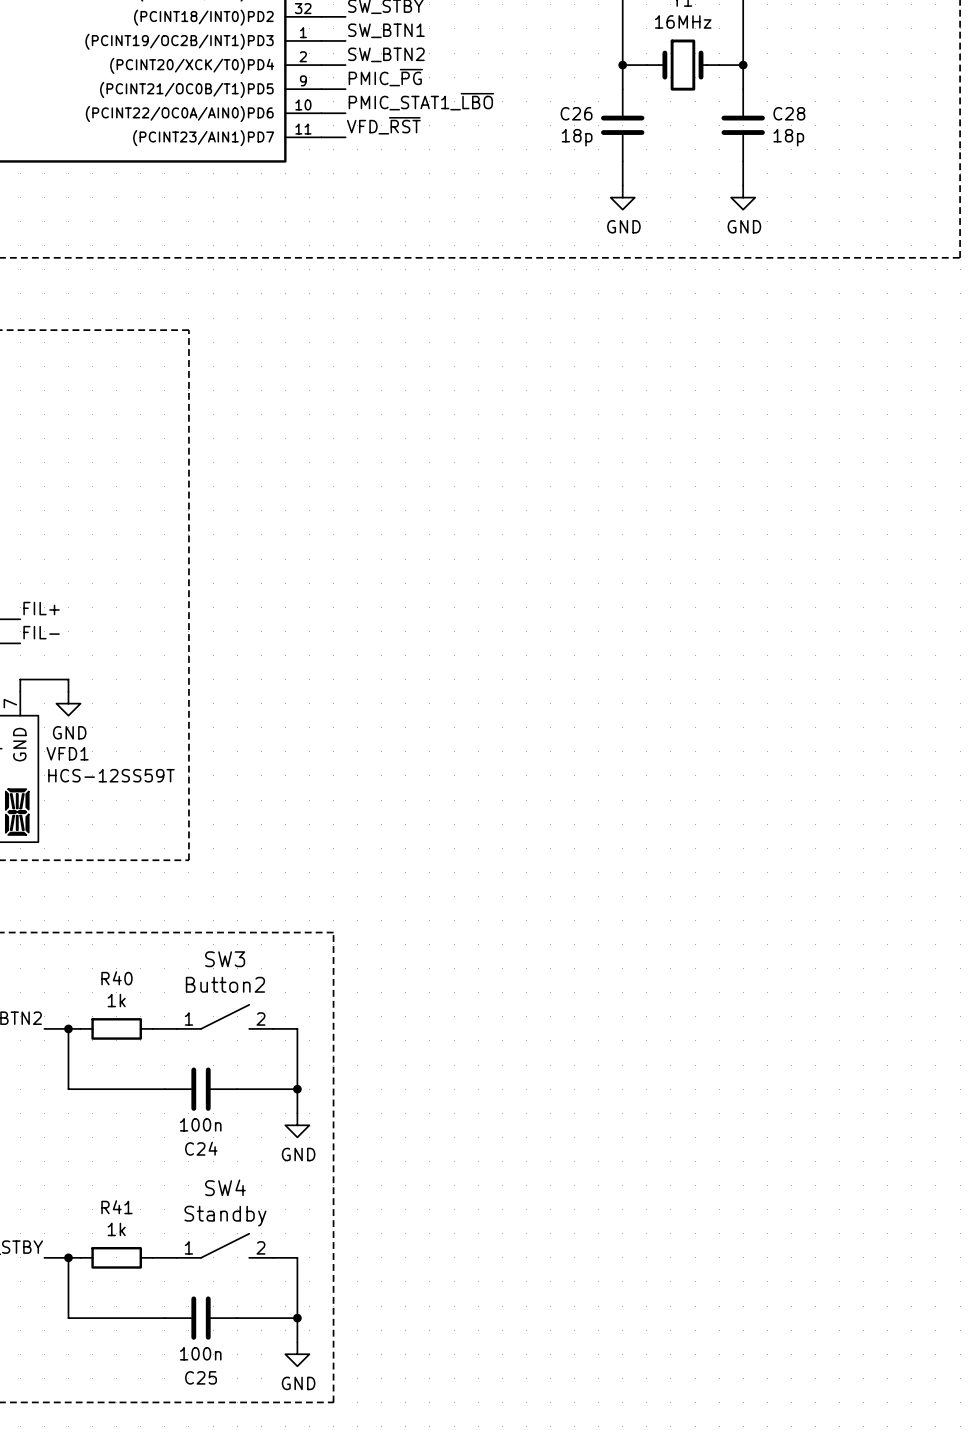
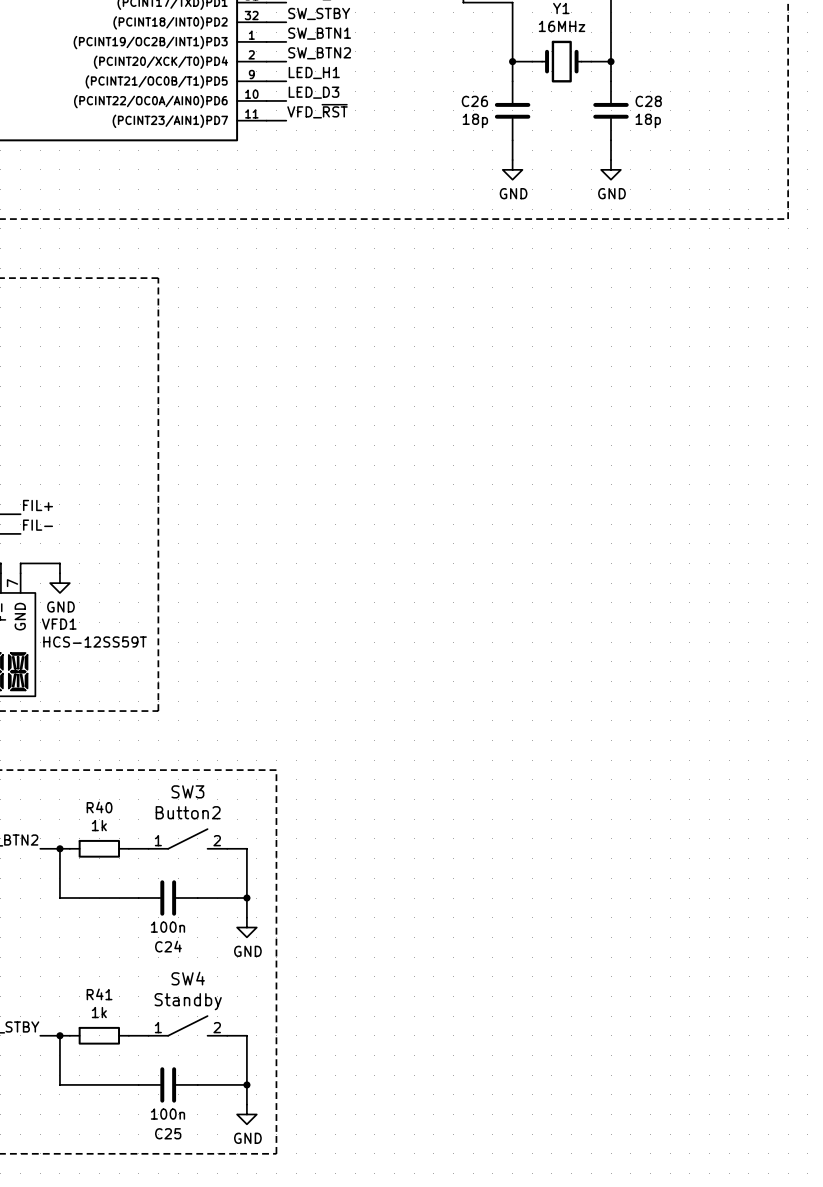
label: PMIC_~{PG} (385, 77) -> LED_H1 (314, 72)
label: PMIC_STAT1_~{LBO} (421, 101) -> LED_D3 (314, 92)

